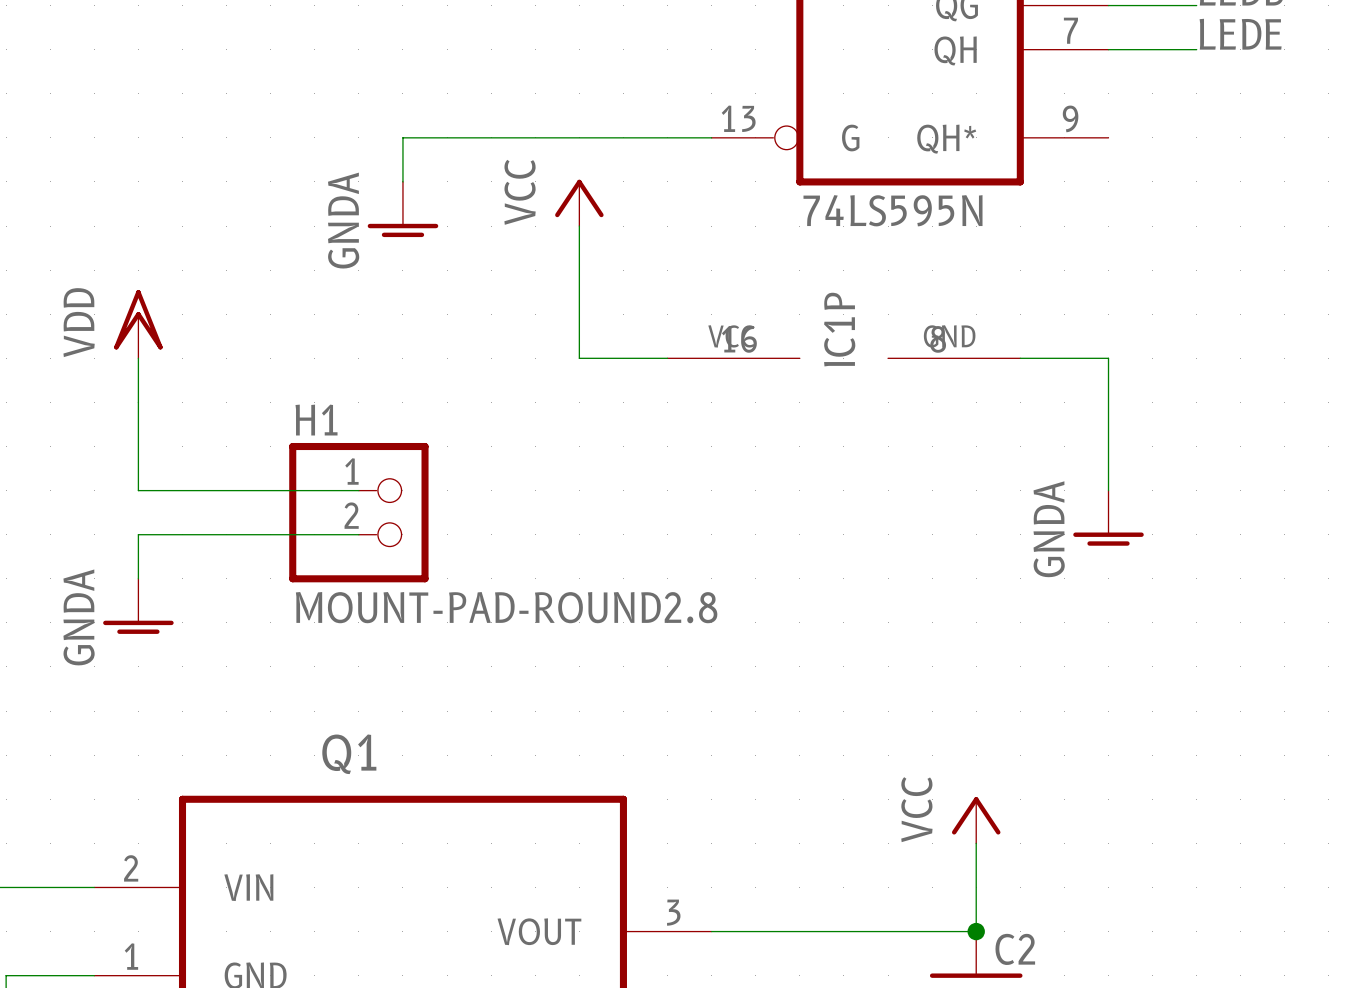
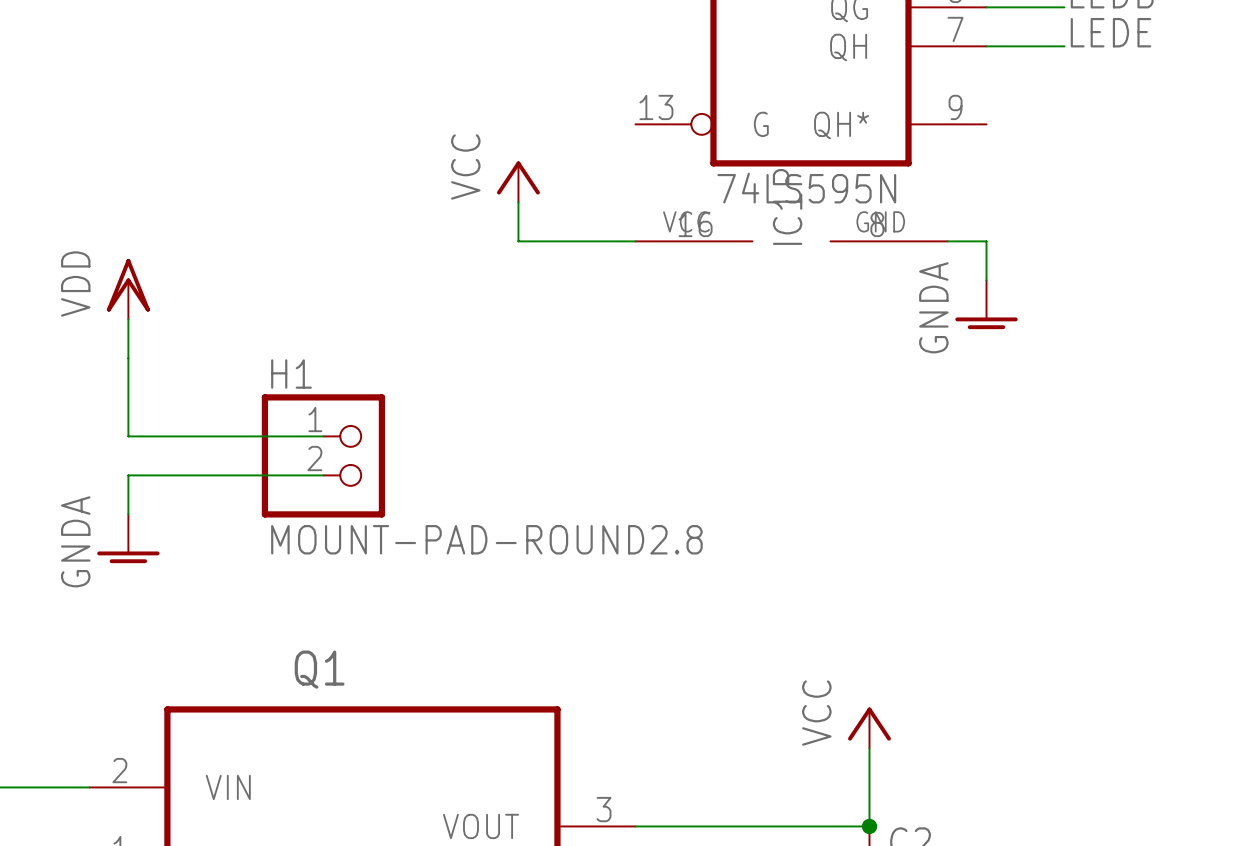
wire: (711, 137) (402, 137) (402, 181) -> none
power symbol: GNDA (402, 209) -> none
wire: (579, 270) (579, 358) (667, 358) -> (518, 241) (635, 241)
wire: none -> (947, 241) (986, 241) (986, 280)
IC1P position: (843, 358) -> (791, 241)
wire: (1020, 358) (1108, 358) (1108, 490) -> none
power symbol position: GNDA (1108, 518) -> GNDA (986, 304)

